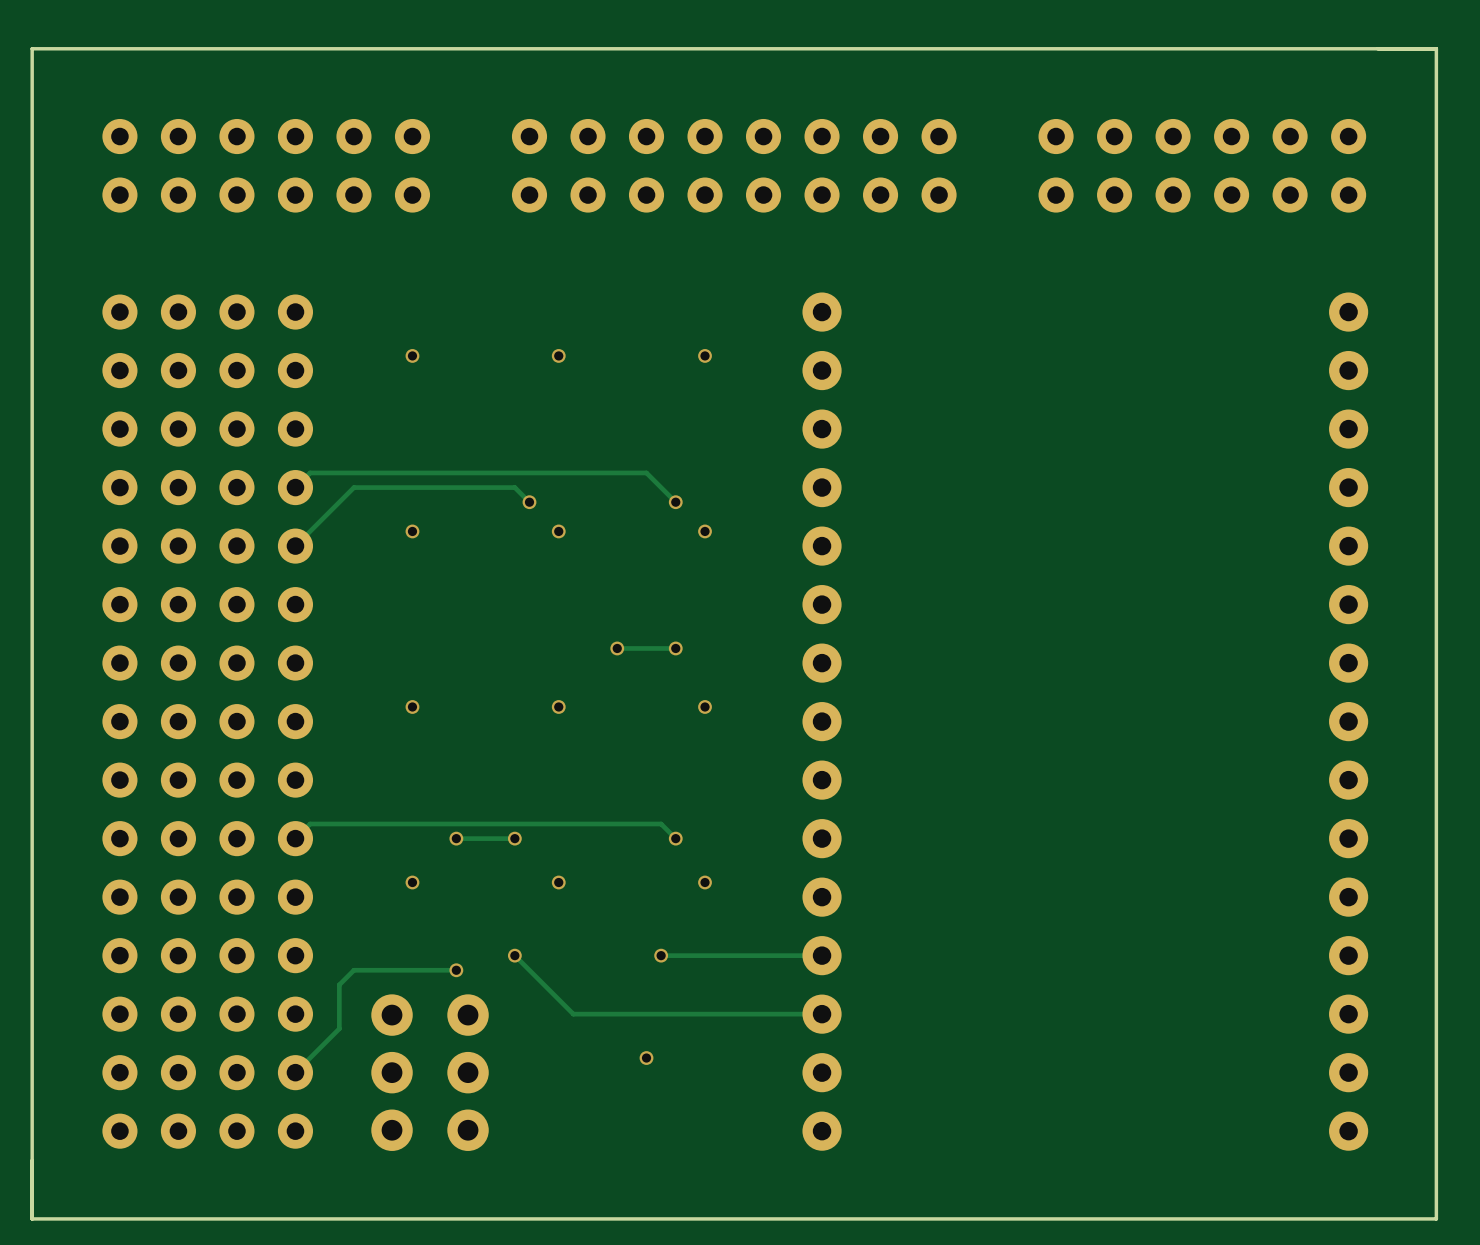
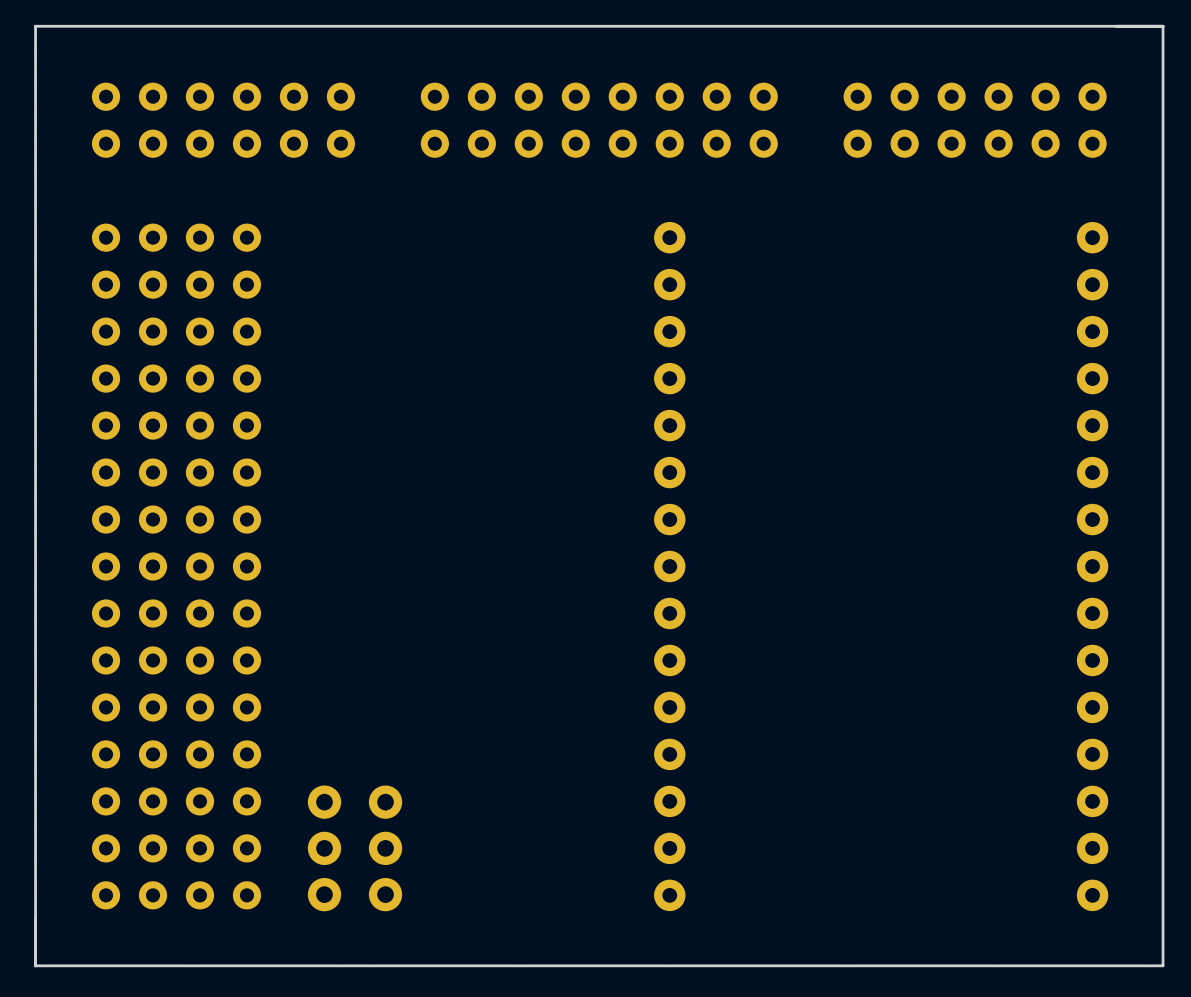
via: (412, 355) -> none
via: (558, 355) -> none
via: (705, 355) -> none
track: (295, 487) (310, 472) (646, 472) (675, 502) -> none
track: (529, 502) (514, 487) (353, 487) (295, 546) -> none
via: (529, 502) -> none
via: (675, 502) -> none
via: (412, 531) -> none
via: (558, 531) -> none
via: (705, 531) -> none
via: (617, 648) -> none
track: (675, 648) (617, 648) -> none
via: (675, 648) -> none
via: (412, 706) -> none
via: (558, 706) -> none
via: (705, 706) -> none
via: (456, 838) -> none
track: (514, 838) (456, 838) -> none
via: (514, 838) -> none
track: (675, 838) (661, 824) (310, 824) (295, 838) -> none
via: (675, 838) -> none
via: (412, 882) -> none
via: (558, 882) -> none
via: (705, 882) -> none
track: (514, 955) (573, 1014) (822, 1014) -> none
via: (514, 955) -> none
via: (661, 955) -> none
track: (822, 955) (661, 955) -> none
track: (456, 970) (353, 970) (339, 984) (339, 1028) (295, 1072) -> none
via: (456, 970) -> none
via: (646, 1058) -> none

